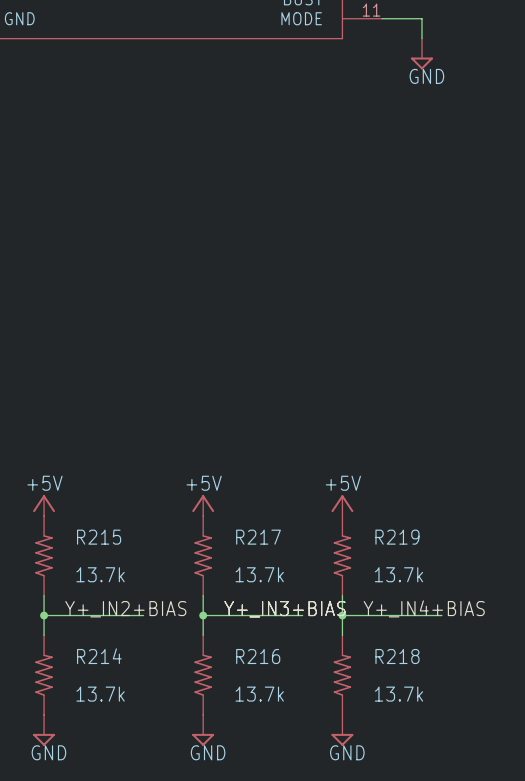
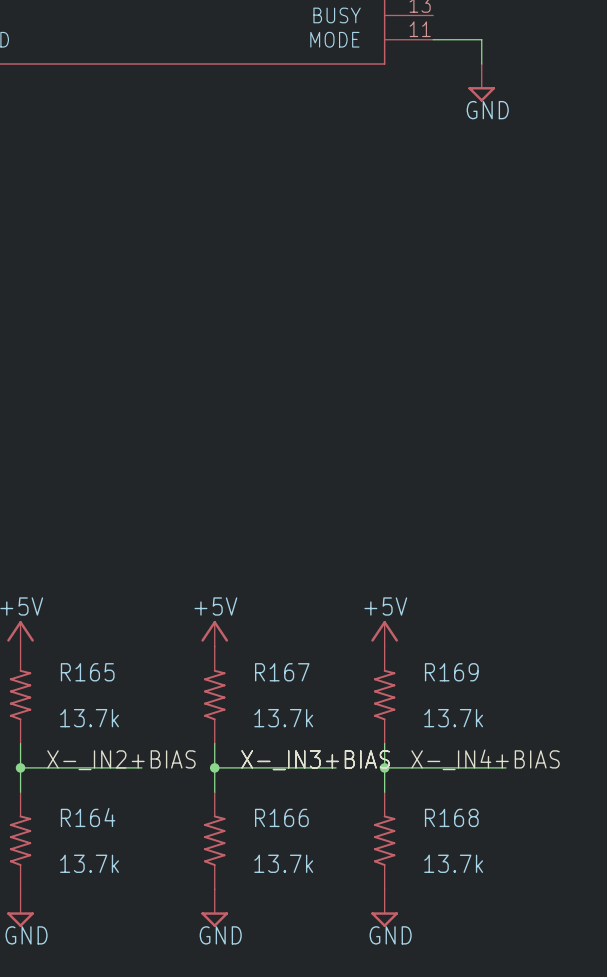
R215 name: R215 (99, 537) -> R165 (87, 672)
R217 name: R217 (258, 537) -> R167 (282, 672)
R219 name: R219 (397, 537) -> R169 (451, 672)
label: Y+_IN4+BIAS (424, 608) -> X-_IN4+BIAS (485, 759)
label: Y+_IN2+BIAS (125, 609) -> X-_IN2+BIAS (121, 760)
label: Y+_IN3+BIAS (284, 609) -> X-_IN3+BIAS (315, 760)
R214 name: R214 (99, 656) -> R164 (88, 817)
R216 name: R216 (258, 656) -> R166 (281, 817)
R218 name: R218 (397, 656) -> R168 (451, 817)

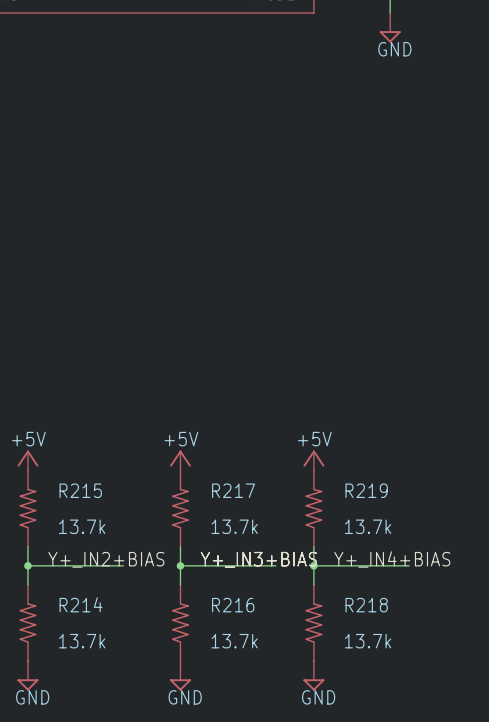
R165 name: R165 (87, 672) -> R215 (80, 490)
R167 name: R167 (282, 672) -> R217 (233, 490)
R169 name: R169 (451, 672) -> R219 (366, 490)
label: X-_IN4+BIAS (485, 759) -> Y+_IN4+BIAS (392, 559)
label: X-_IN2+BIAS (121, 760) -> Y+_IN2+BIAS (106, 559)
label: X-_IN3+BIAS (315, 760) -> Y+_IN3+BIAS (258, 559)
R164 name: R164 (88, 817) -> R214 (80, 604)
R166 name: R166 (281, 817) -> R216 (233, 605)
R168 name: R168 (451, 817) -> R218 (366, 605)

